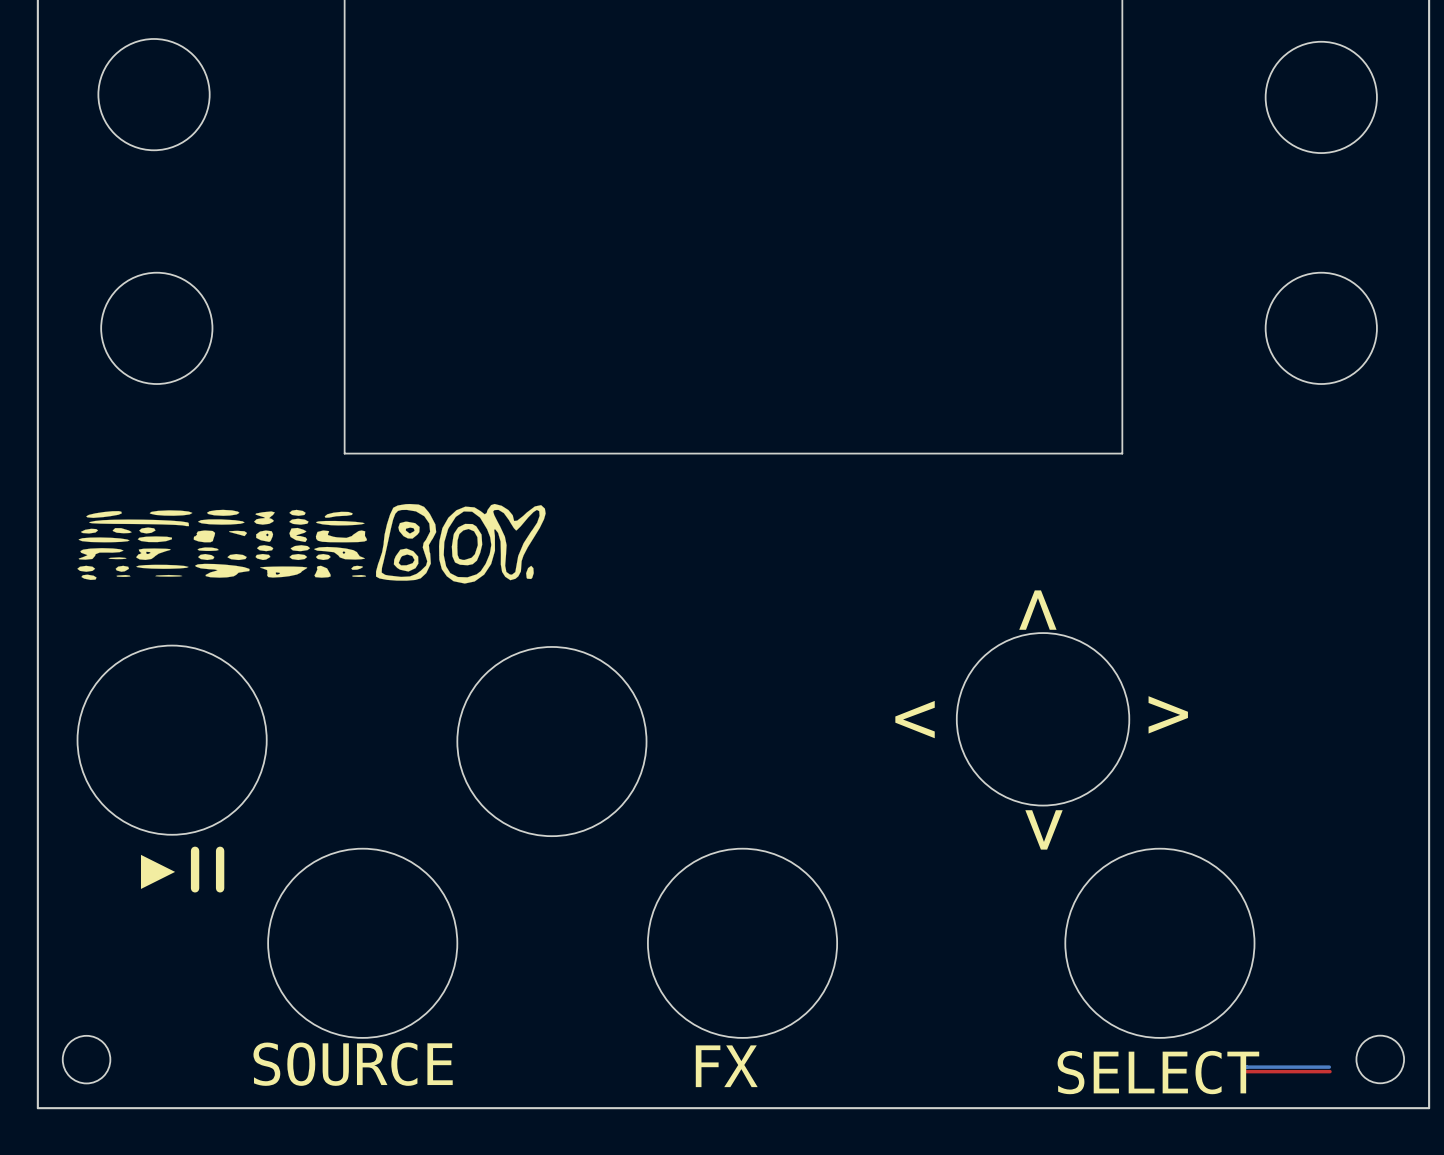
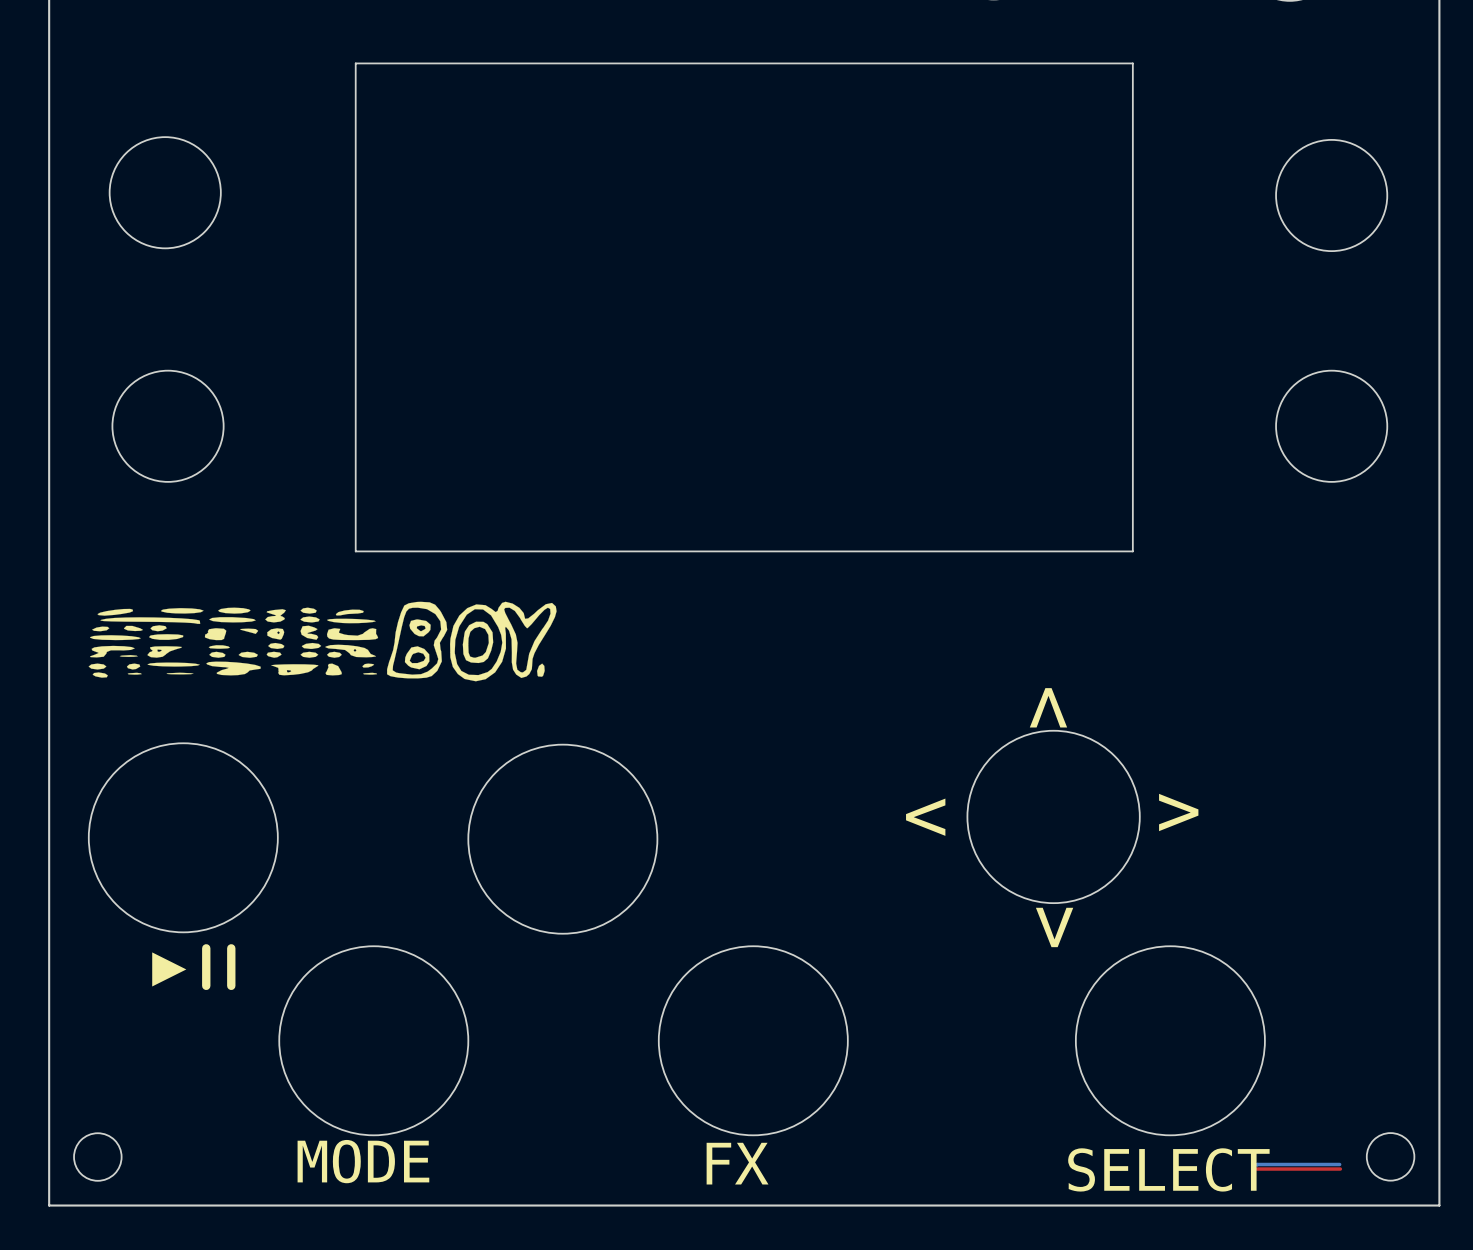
text: SOURCE (353, 1064) -> MODE (363, 1161)

